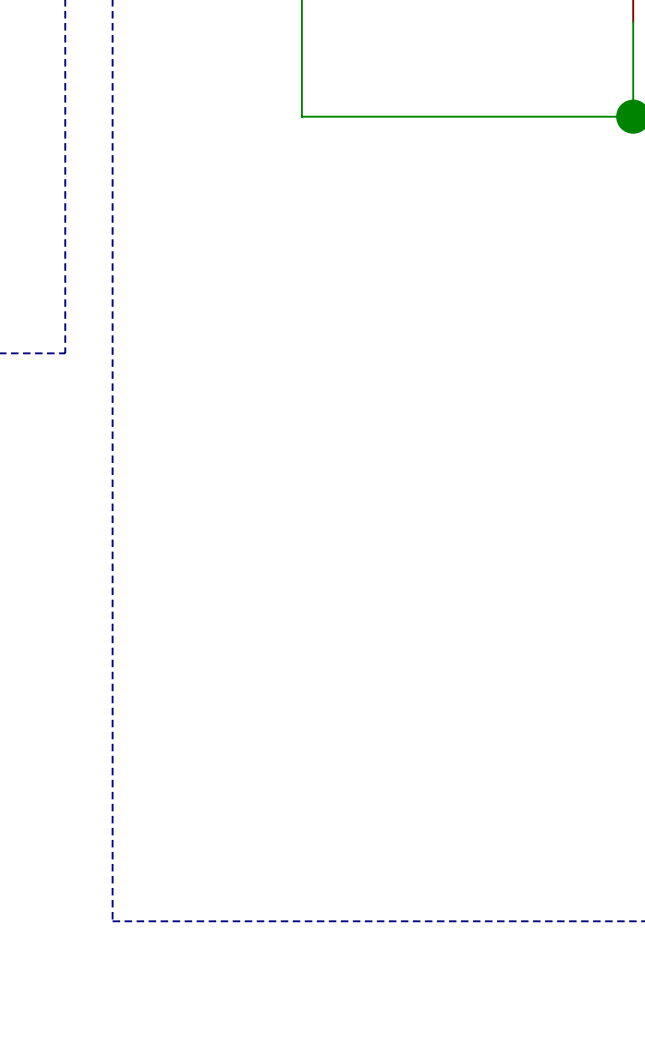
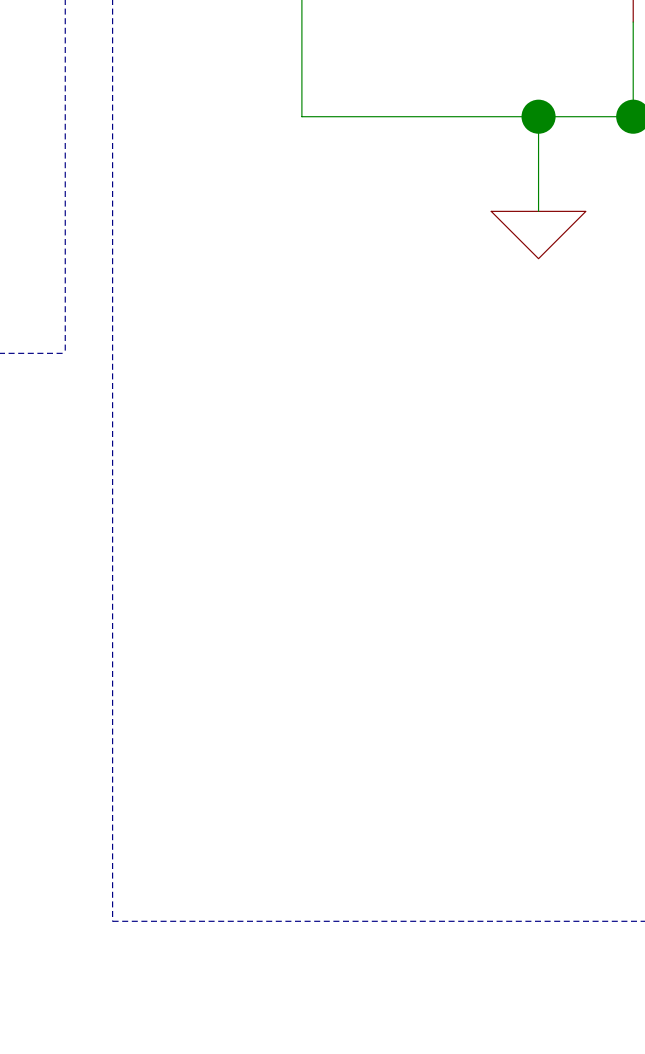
wire: none -> (538, 116) (538, 211)
junction: none -> (538, 116)
power symbol: none -> (538, 235)

